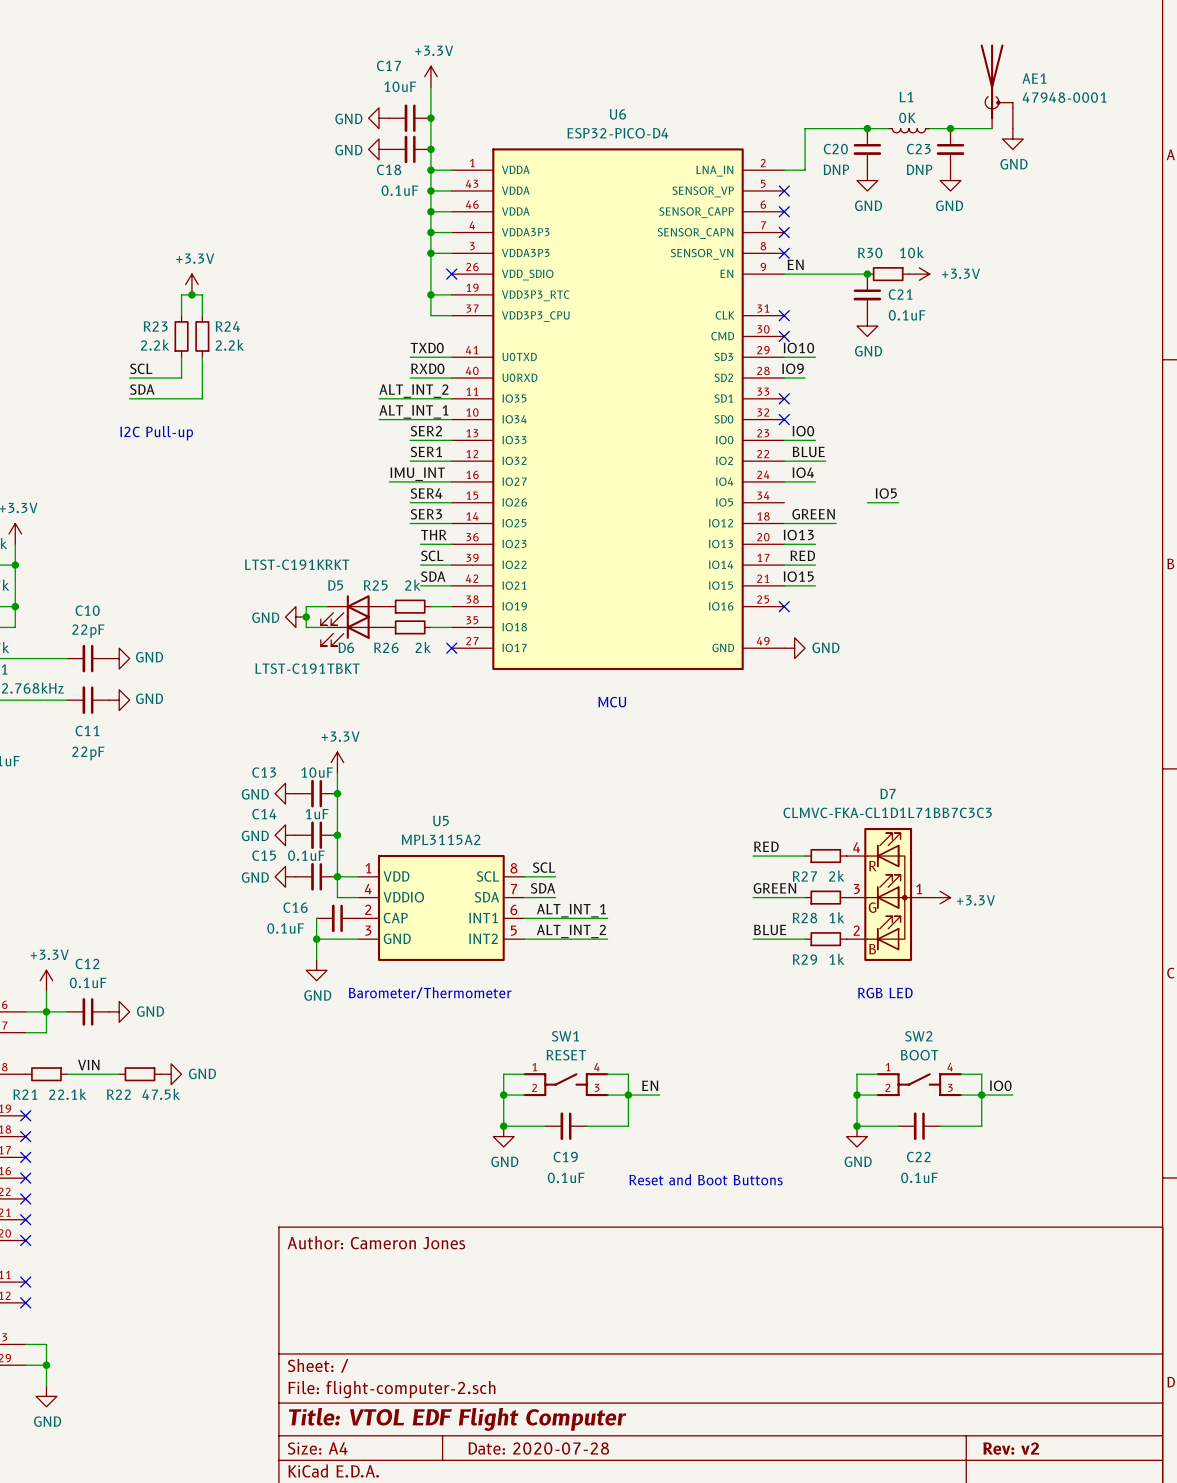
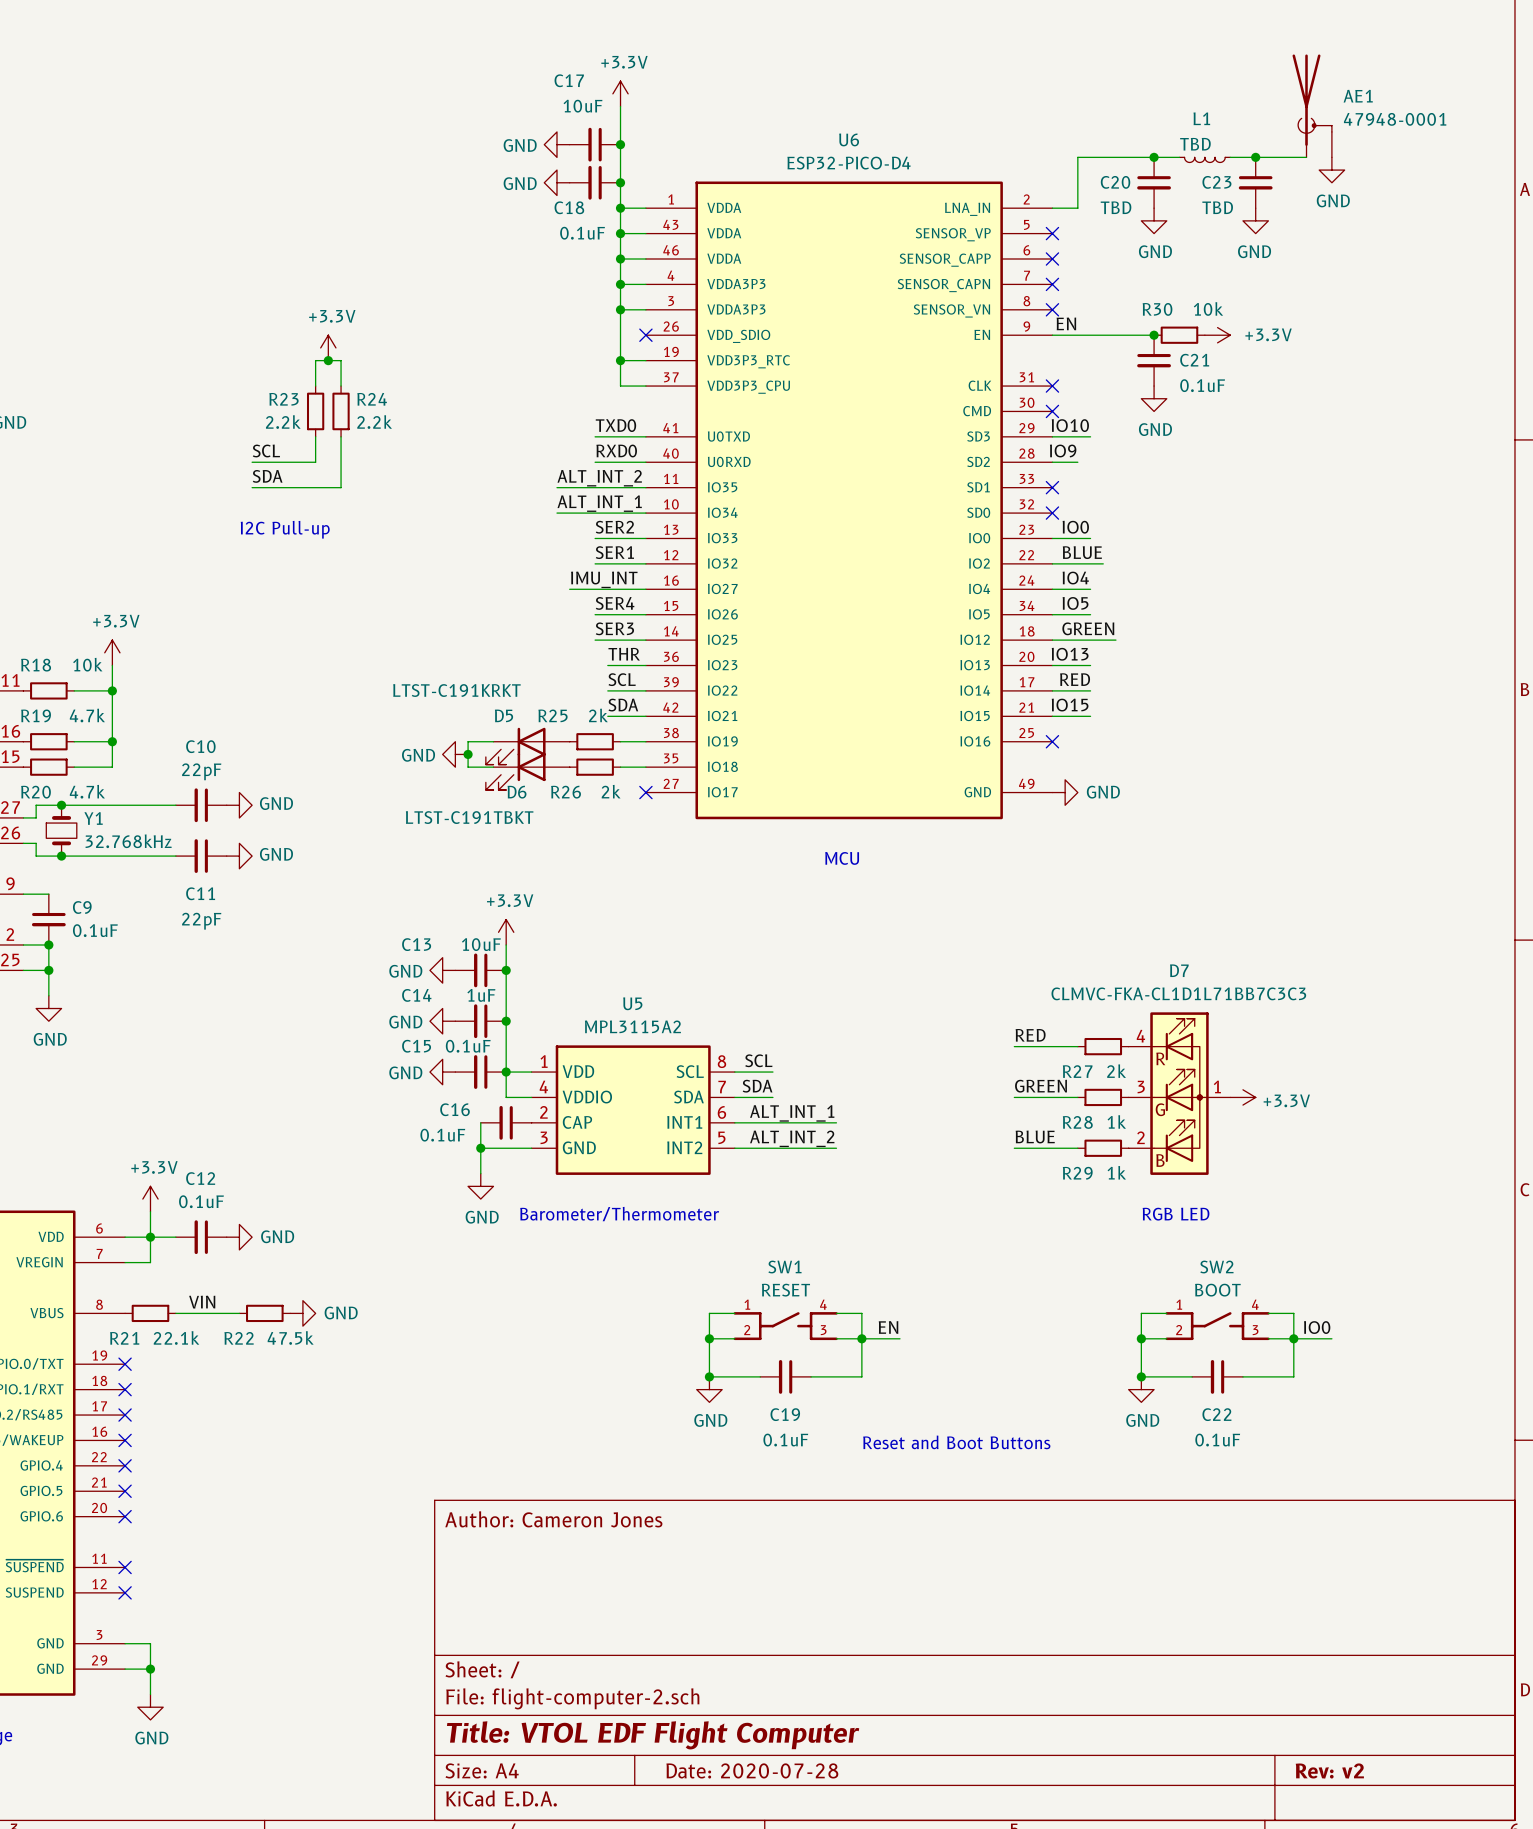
L1 value: 0K (907, 117) -> TBD (1195, 144)
C20 value: DNP (836, 169) -> TBD (1116, 207)
C23 value: DNP (919, 169) -> TBD (1217, 207)
label position: IO5 (886, 493) -> IO5 (1075, 603)
wire: (867, 502) (898, 502) -> (1052, 614) (1090, 614)

